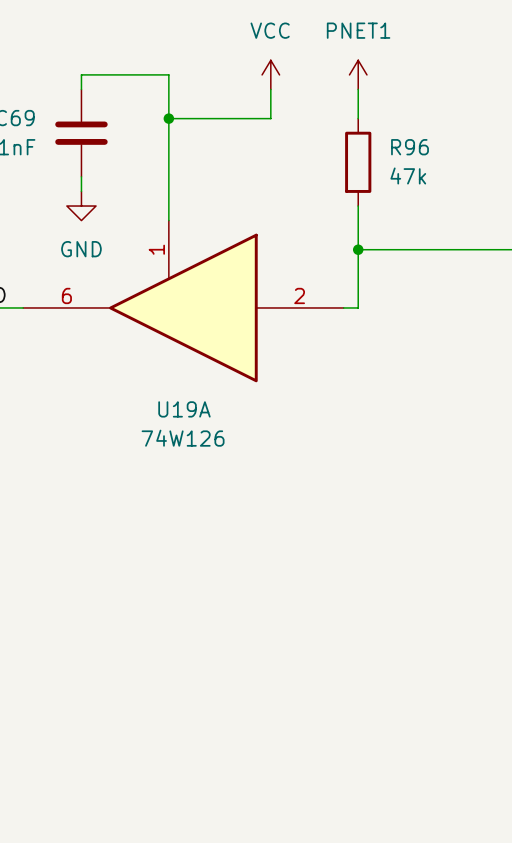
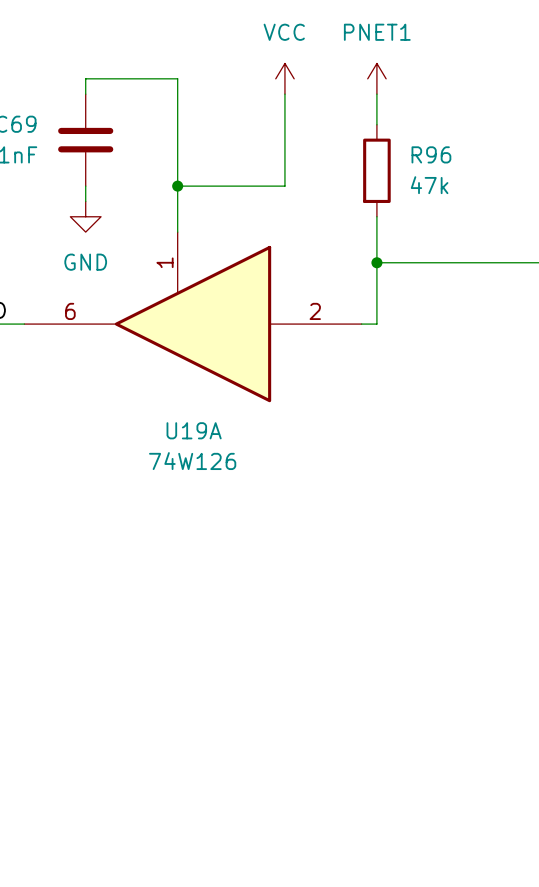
wire: (168, 118) (270, 118) -> (177, 186) (284, 186) (284, 124)
junction position: (168, 118) -> (177, 186)

